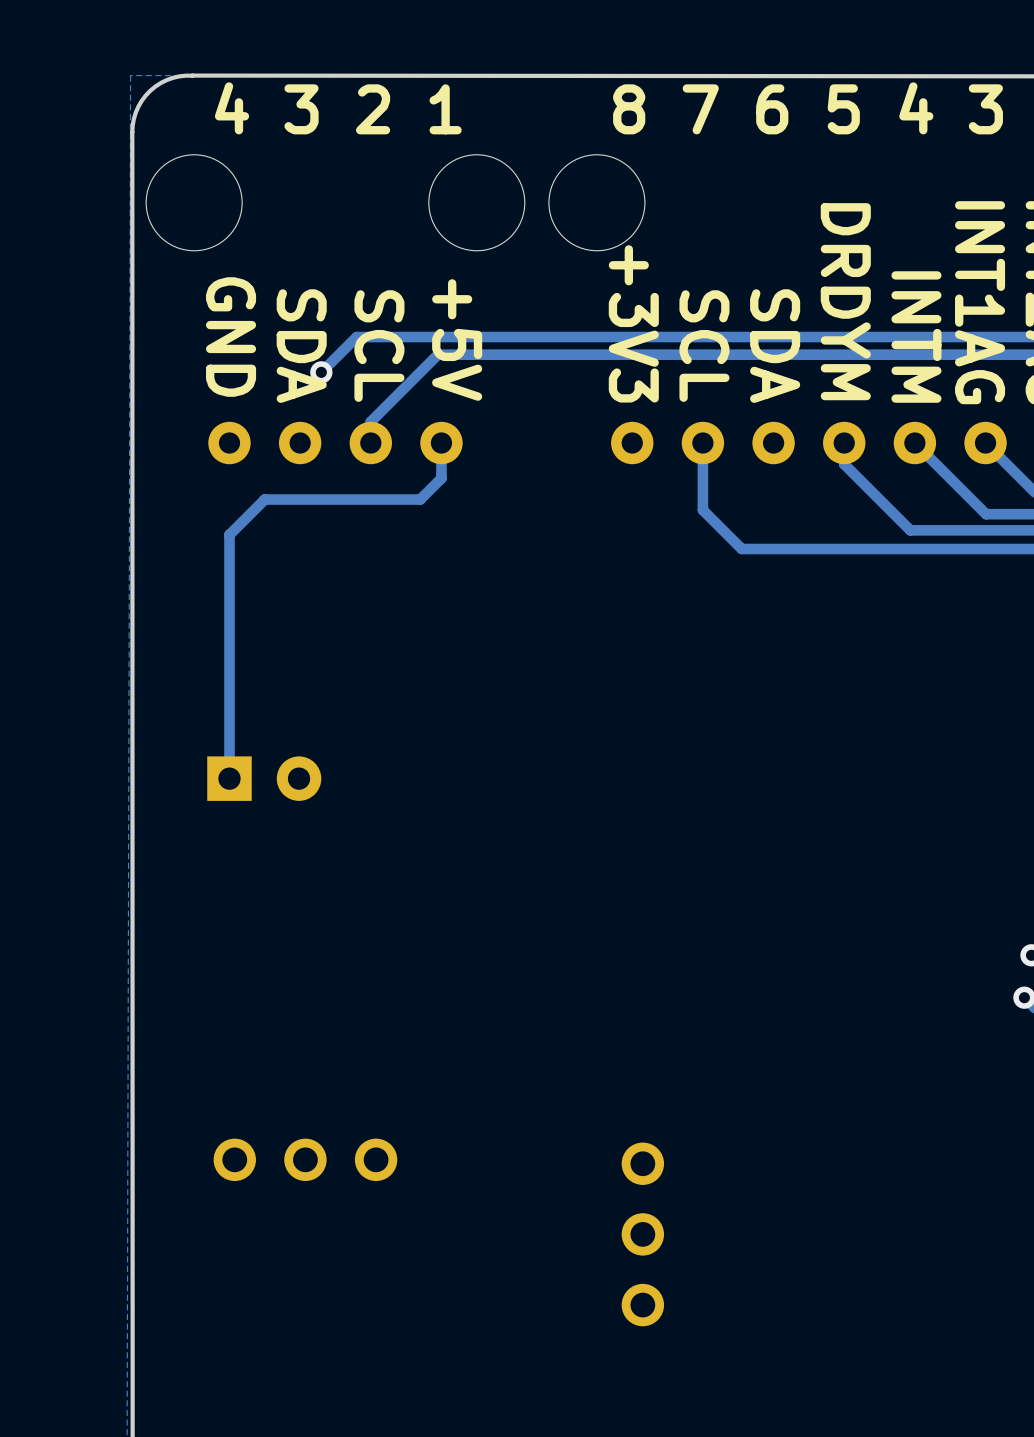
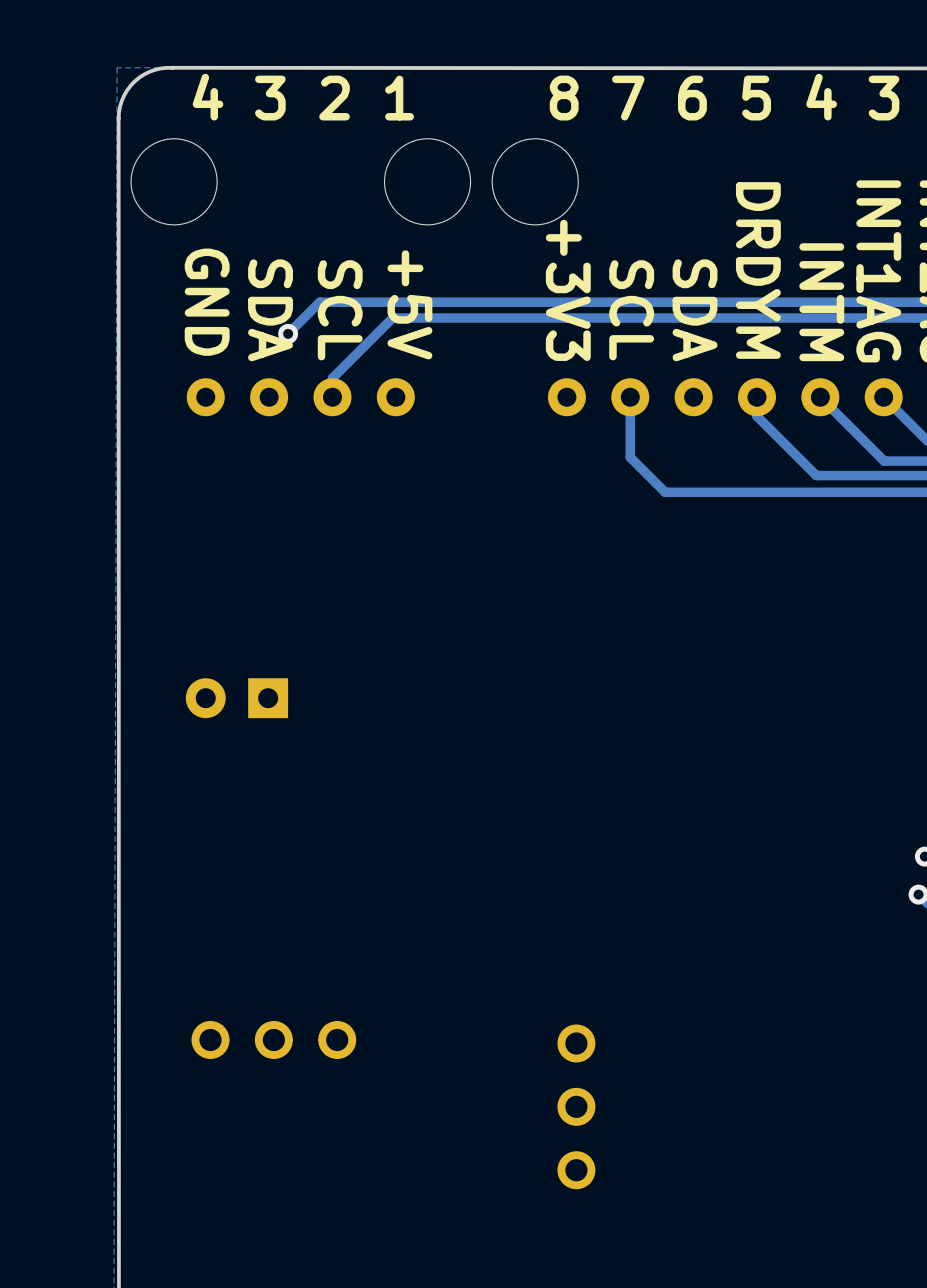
track: (441, 443) (441, 478) (420, 499) (264, 499) (229, 534) (229, 778) -> none
part rotation: 0° (264, 778) -> 180° (236, 698)

